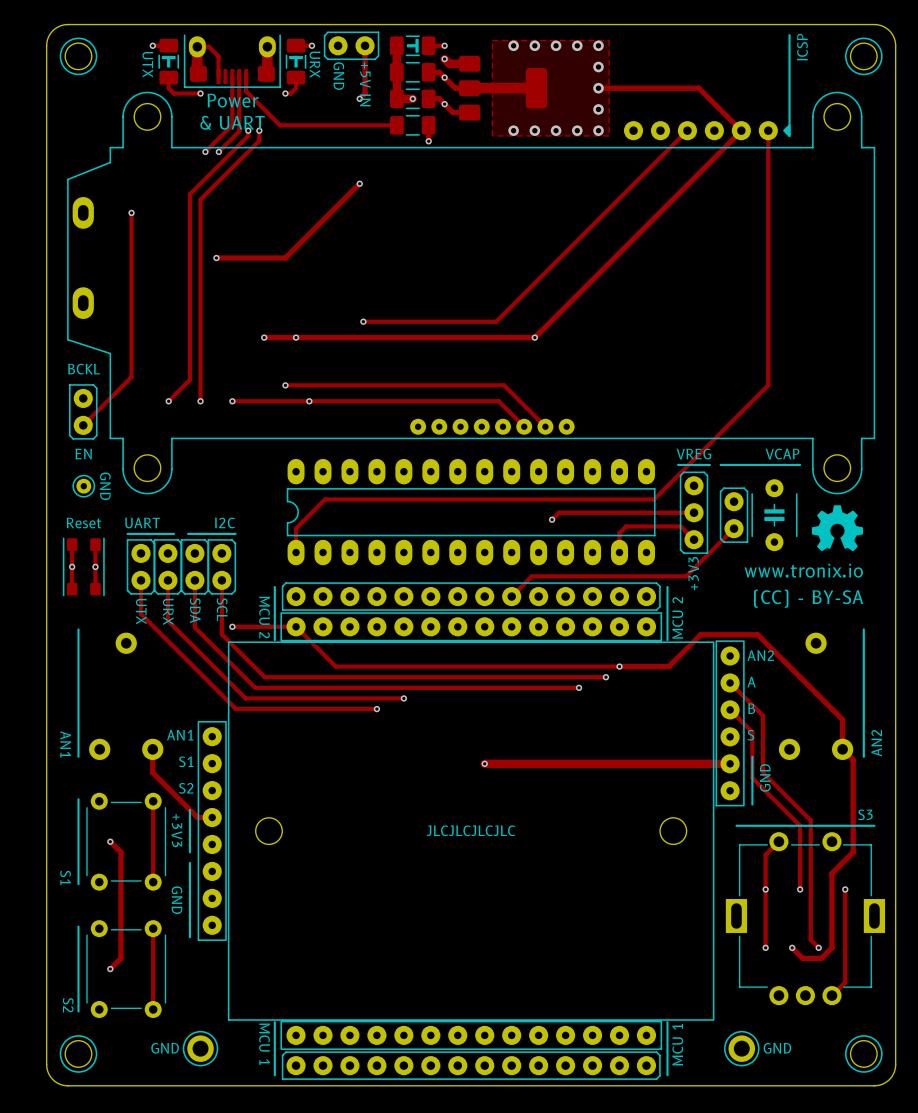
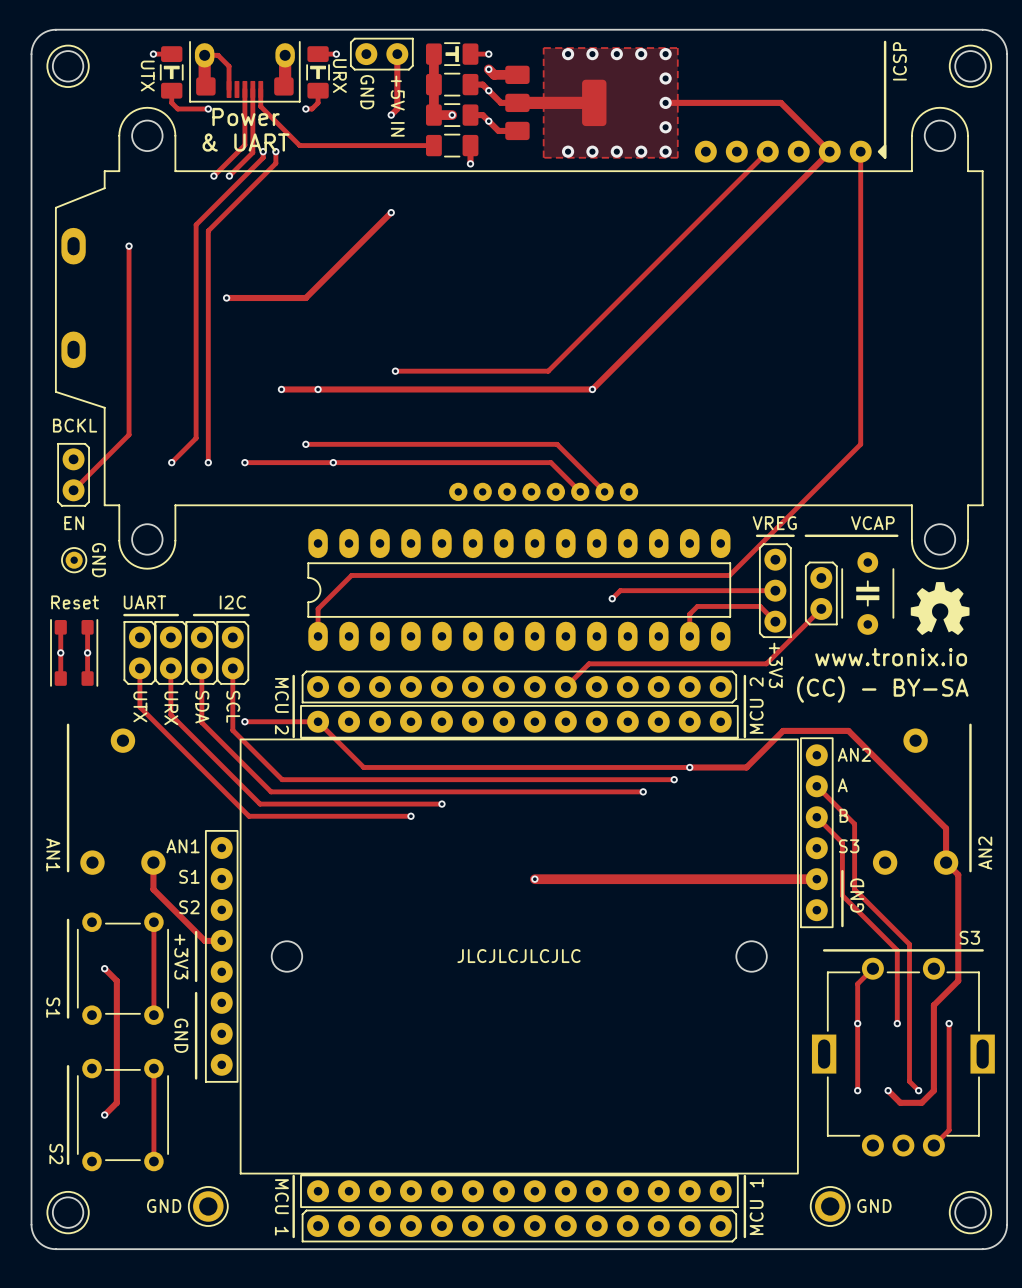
text rotation: 0° (693, 573) -> 180° (775, 665)
text: S (750, 735) -> S3 (849, 846)

